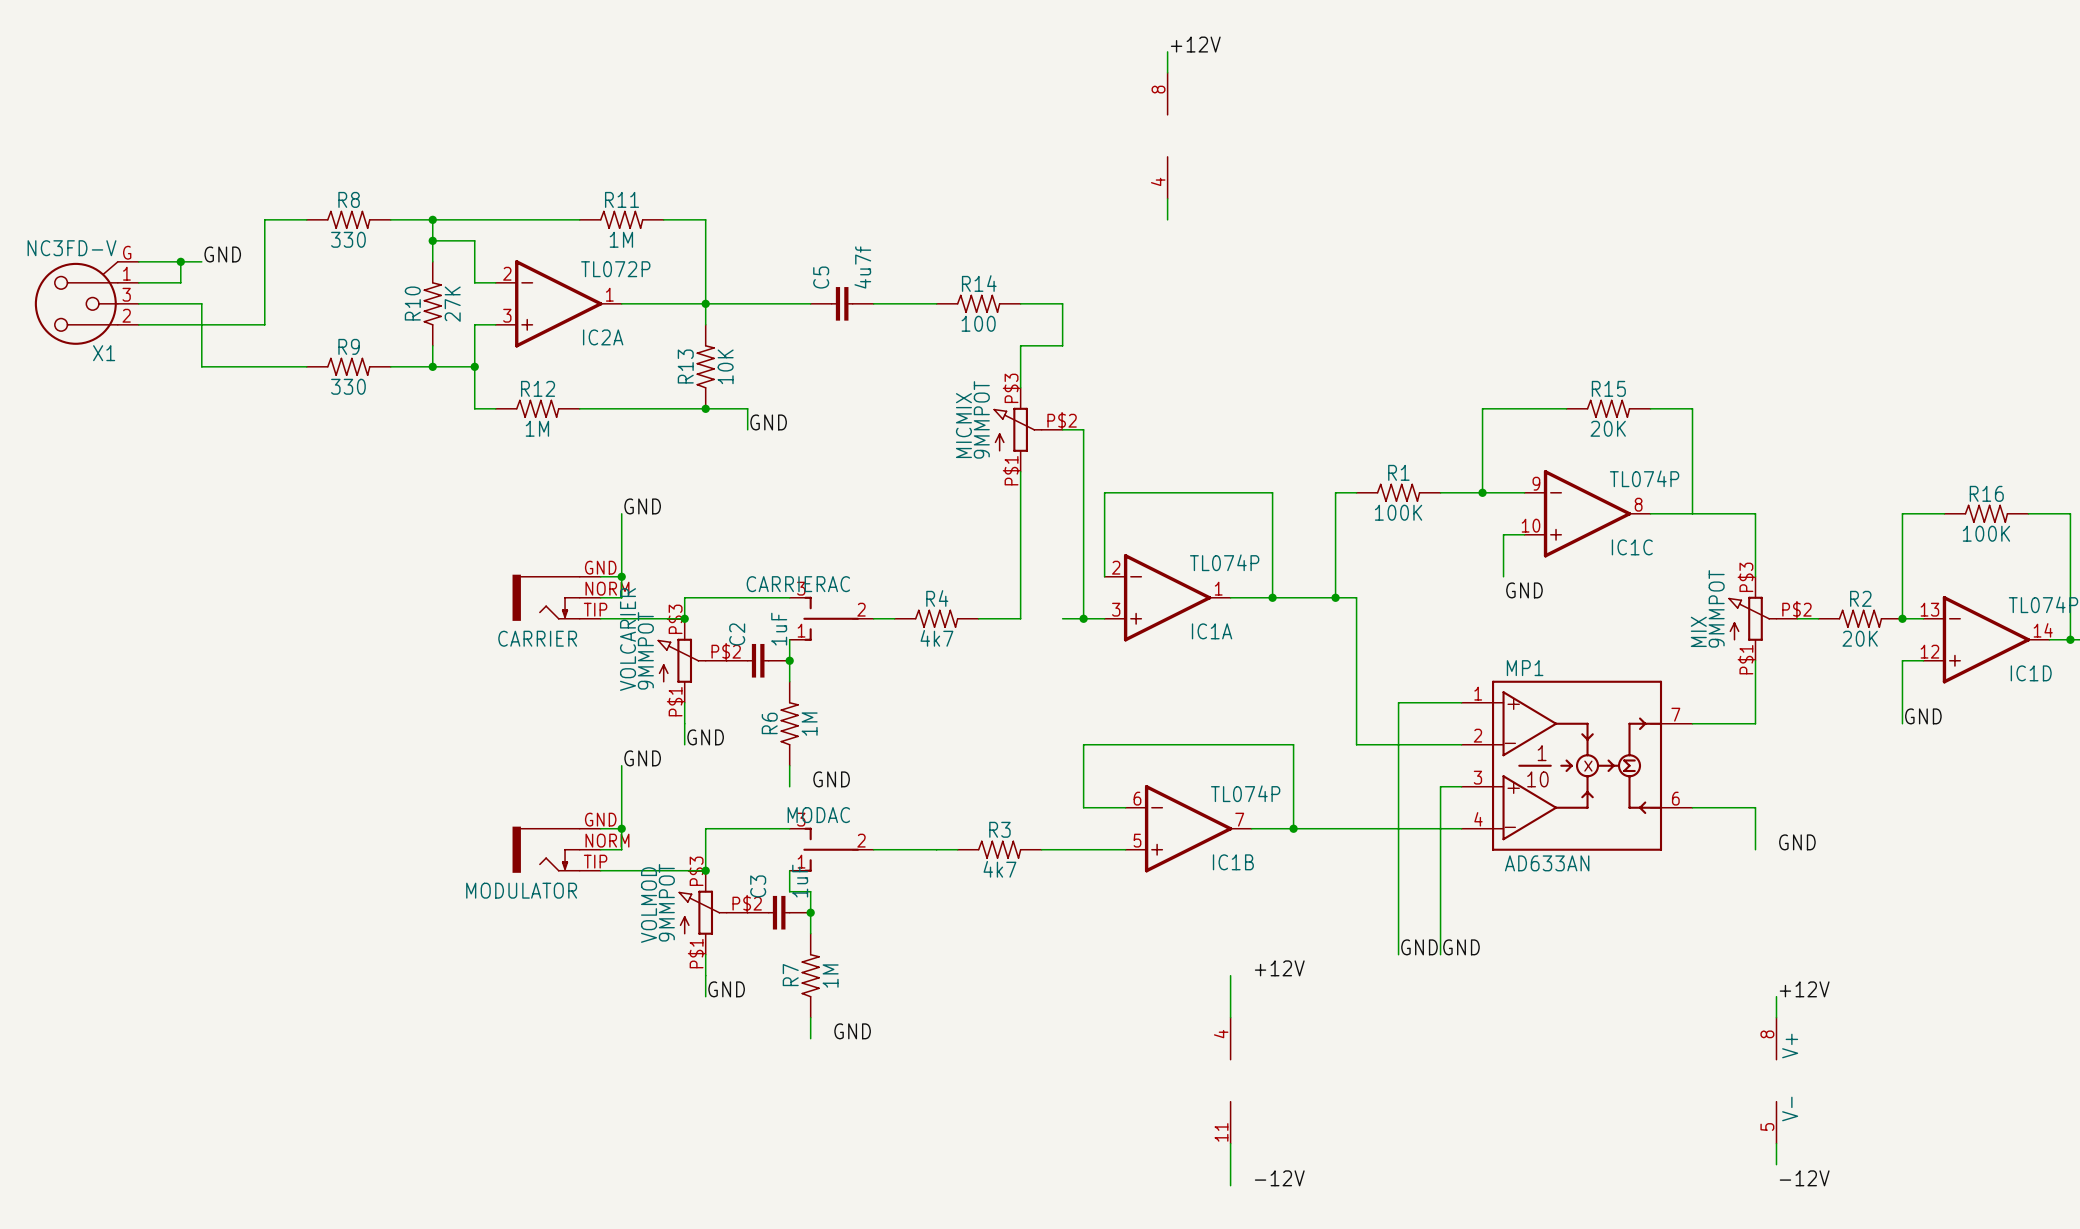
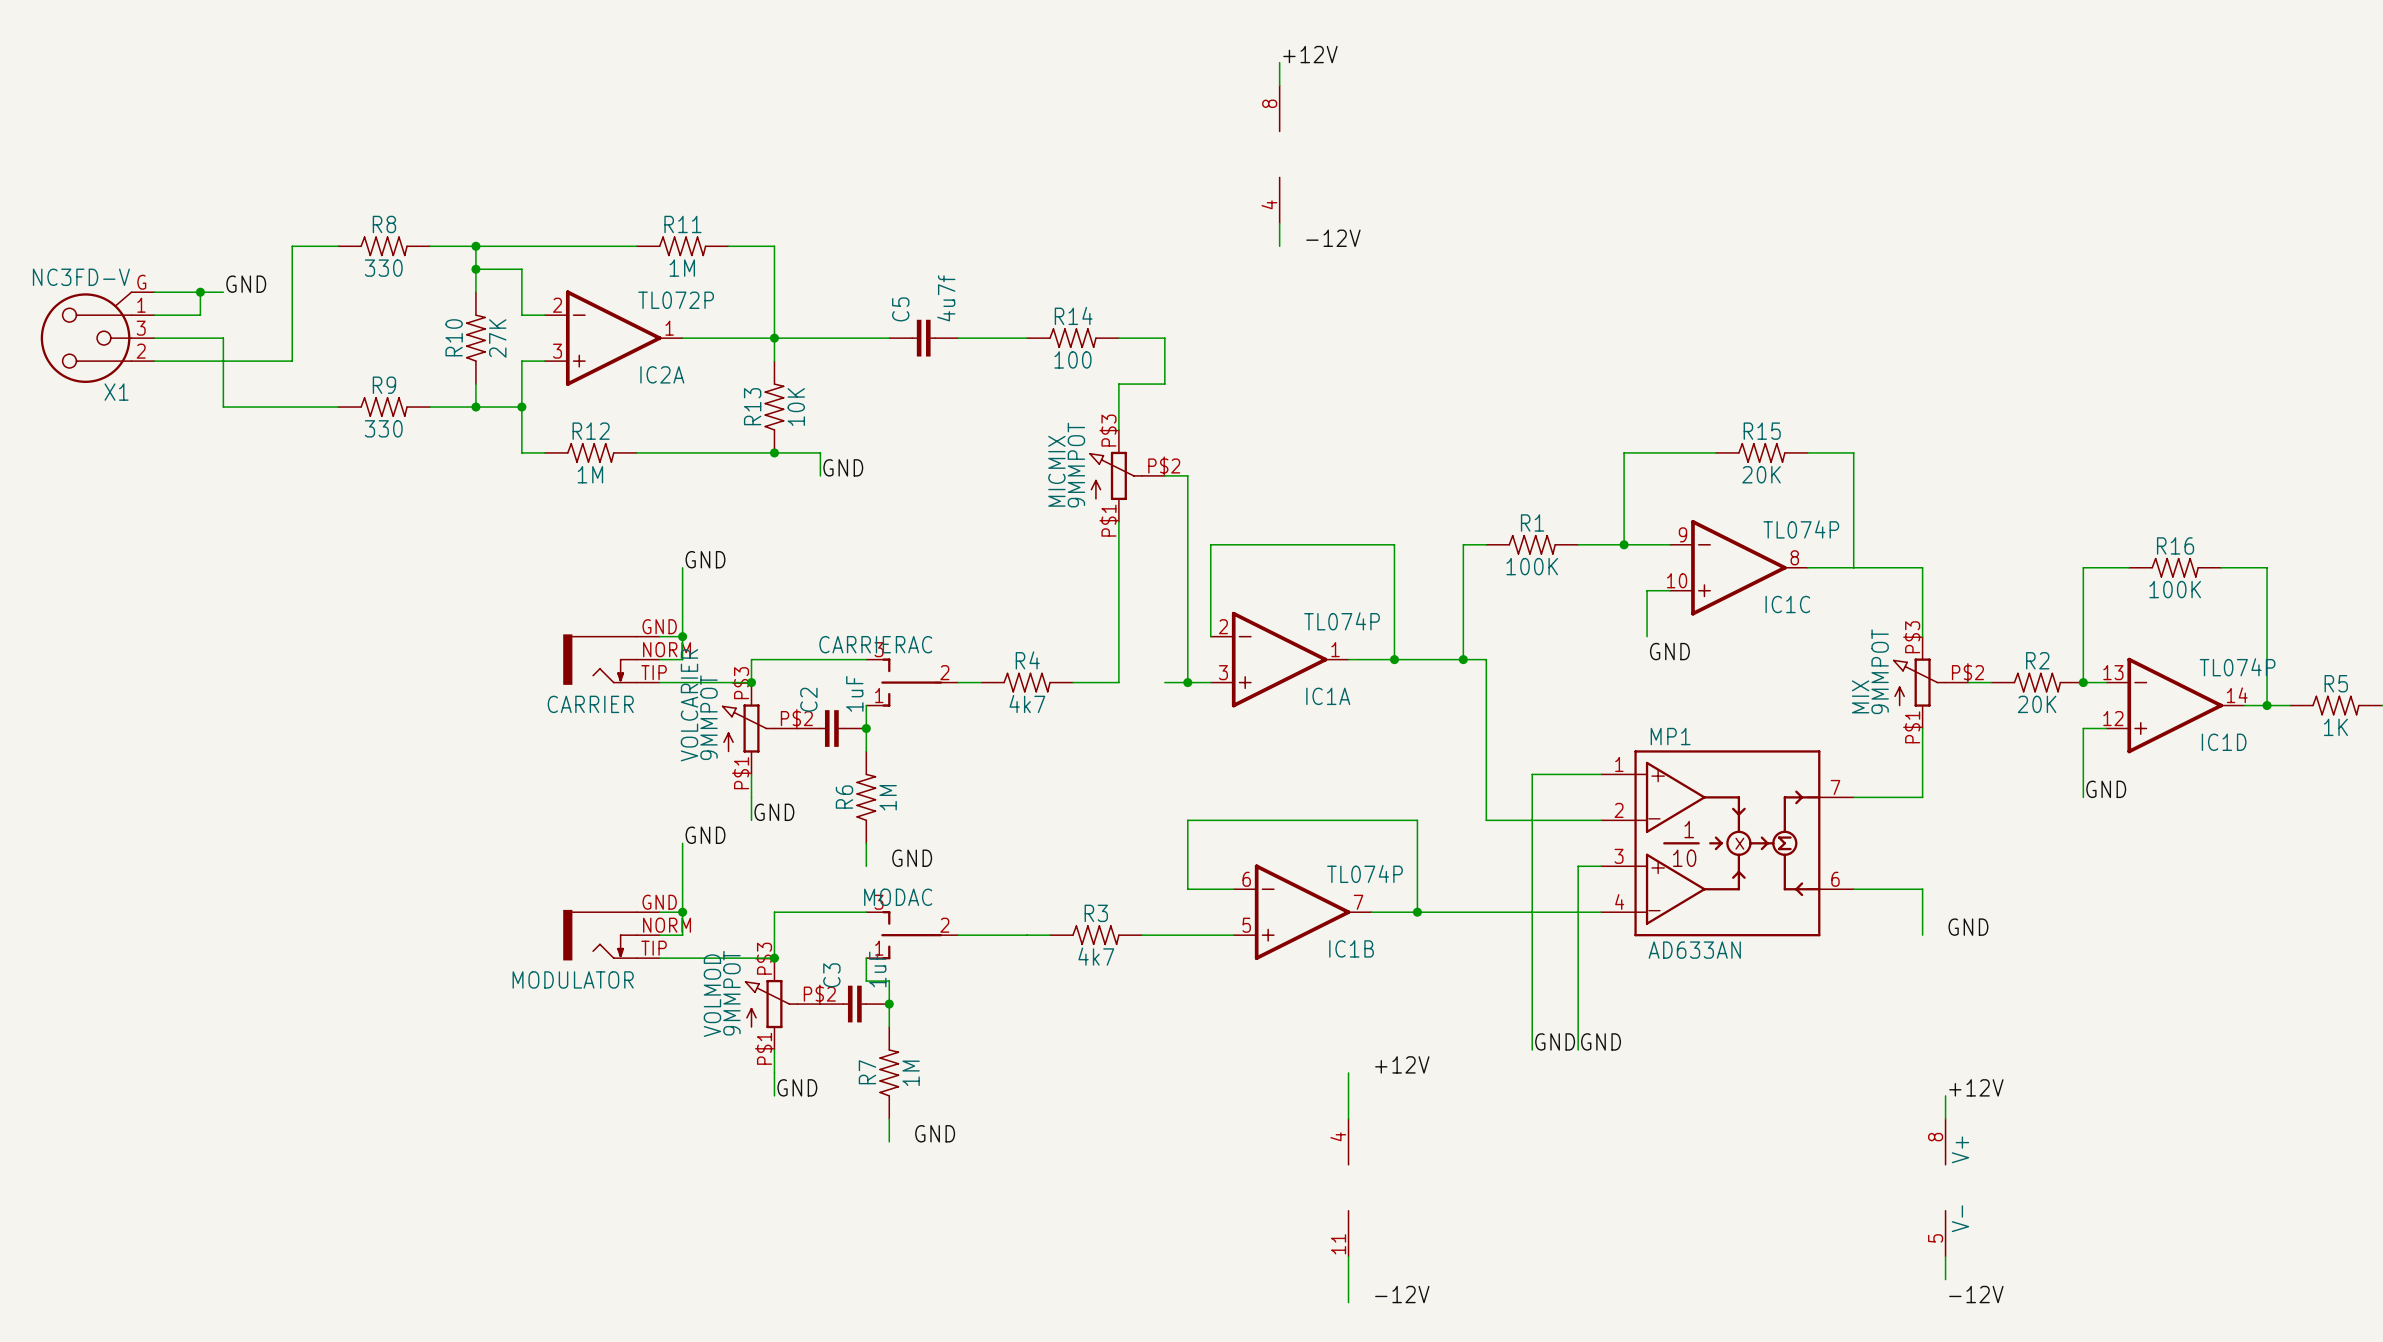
label: none -> -12V (1333, 238)

